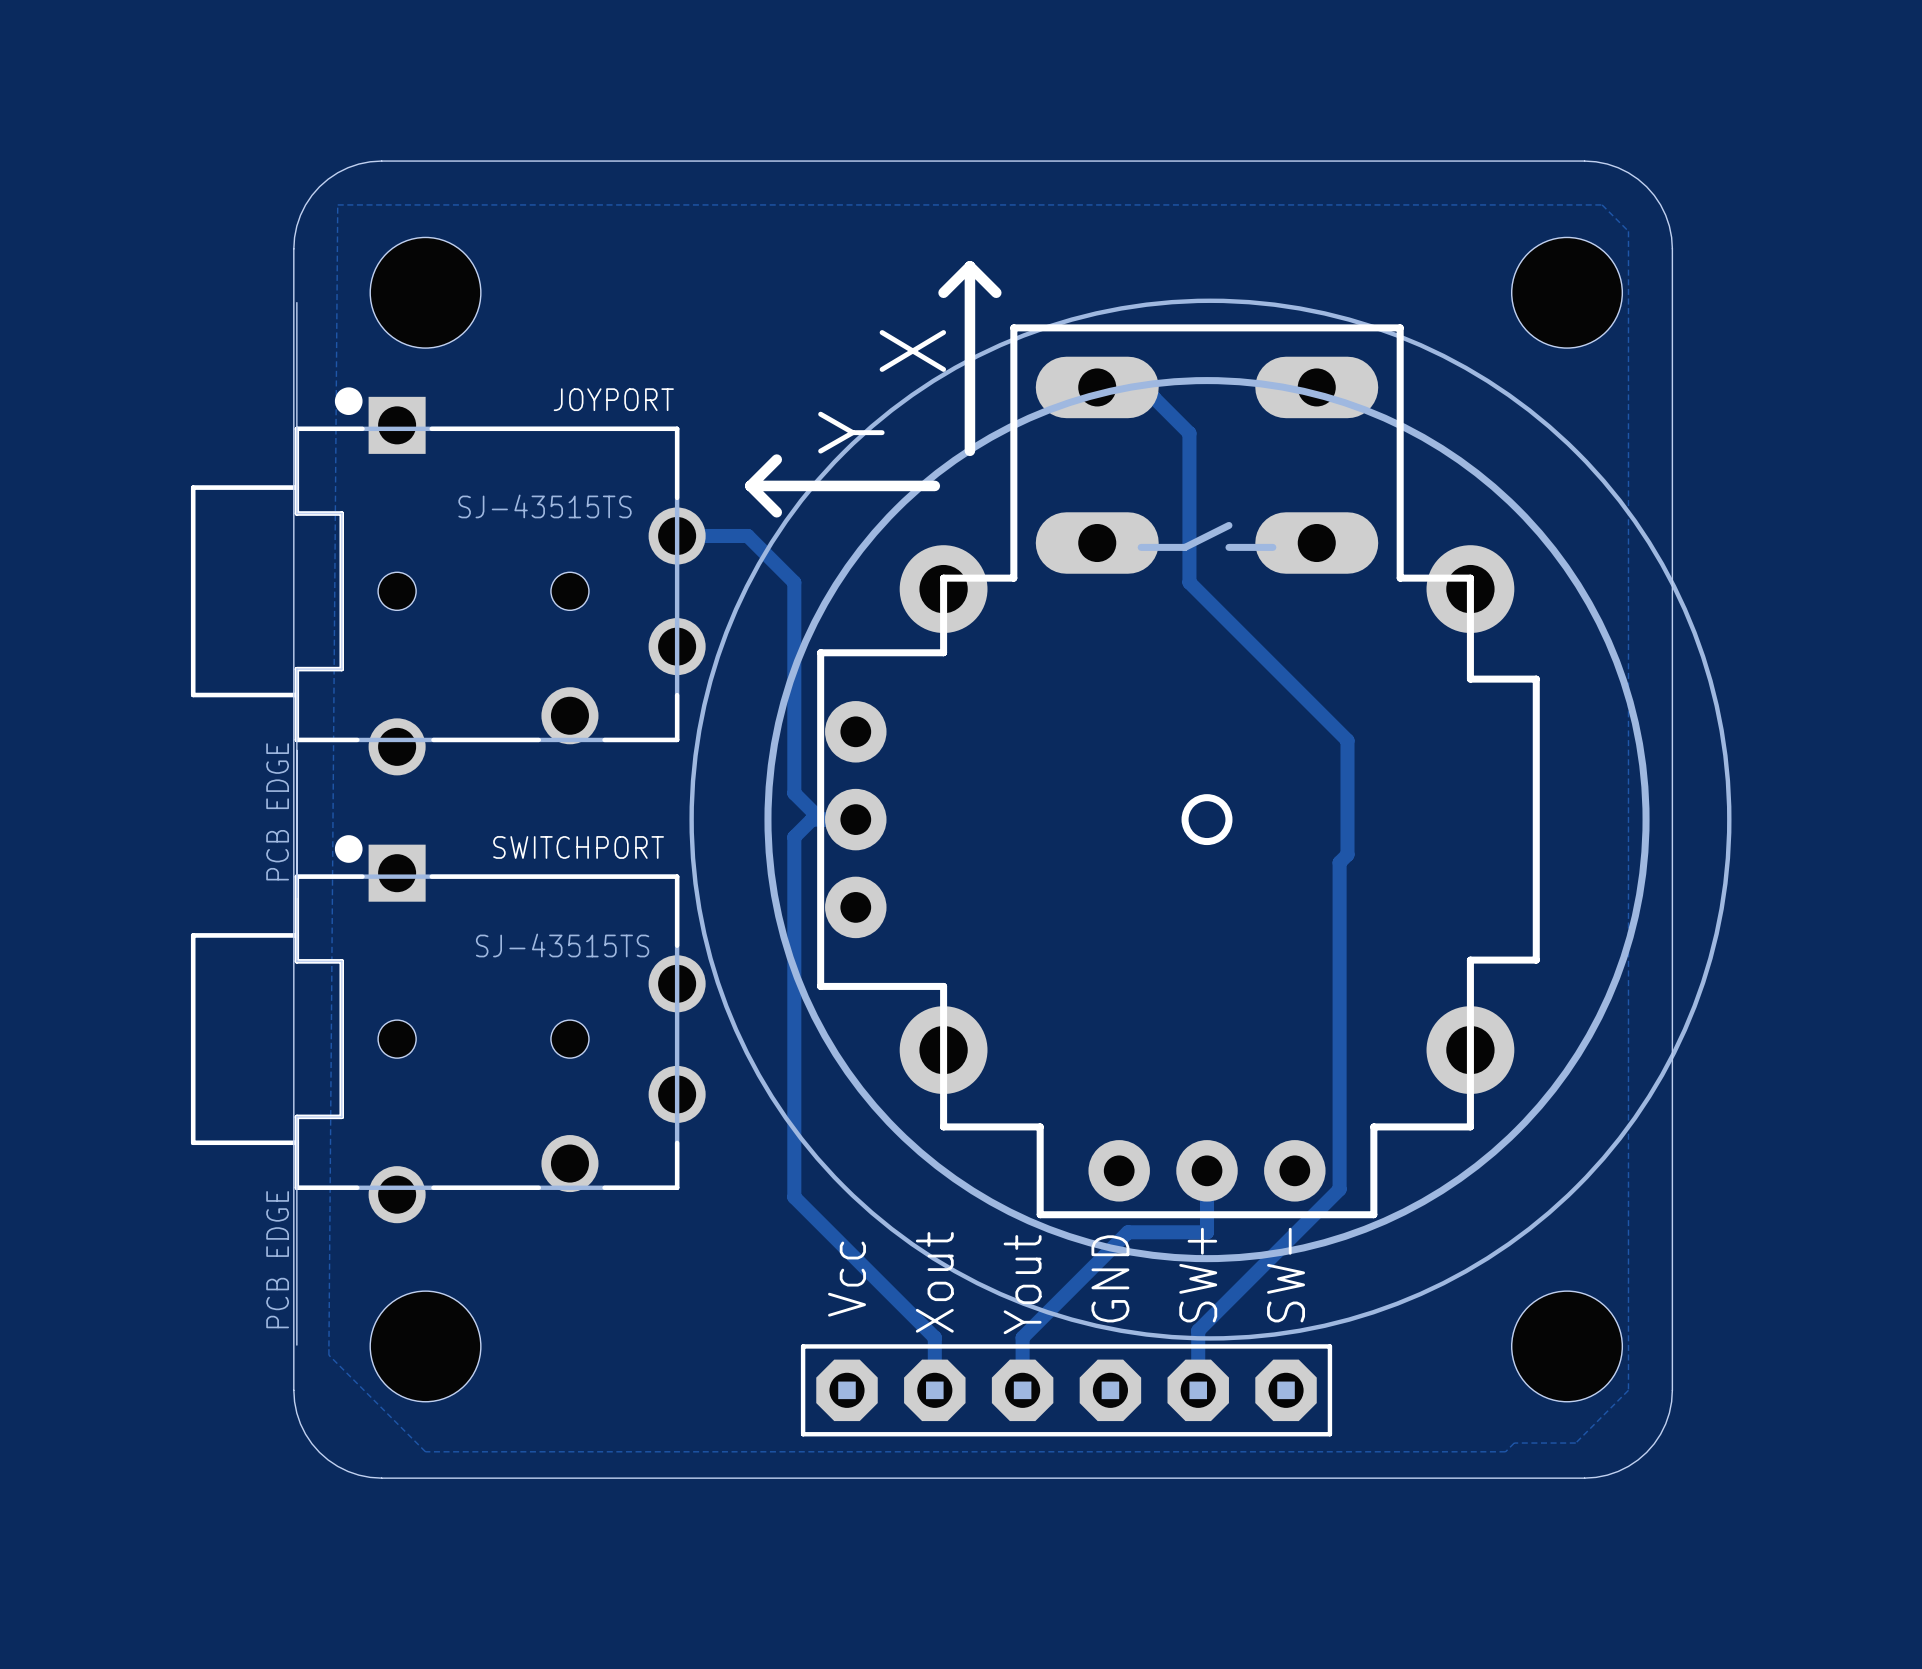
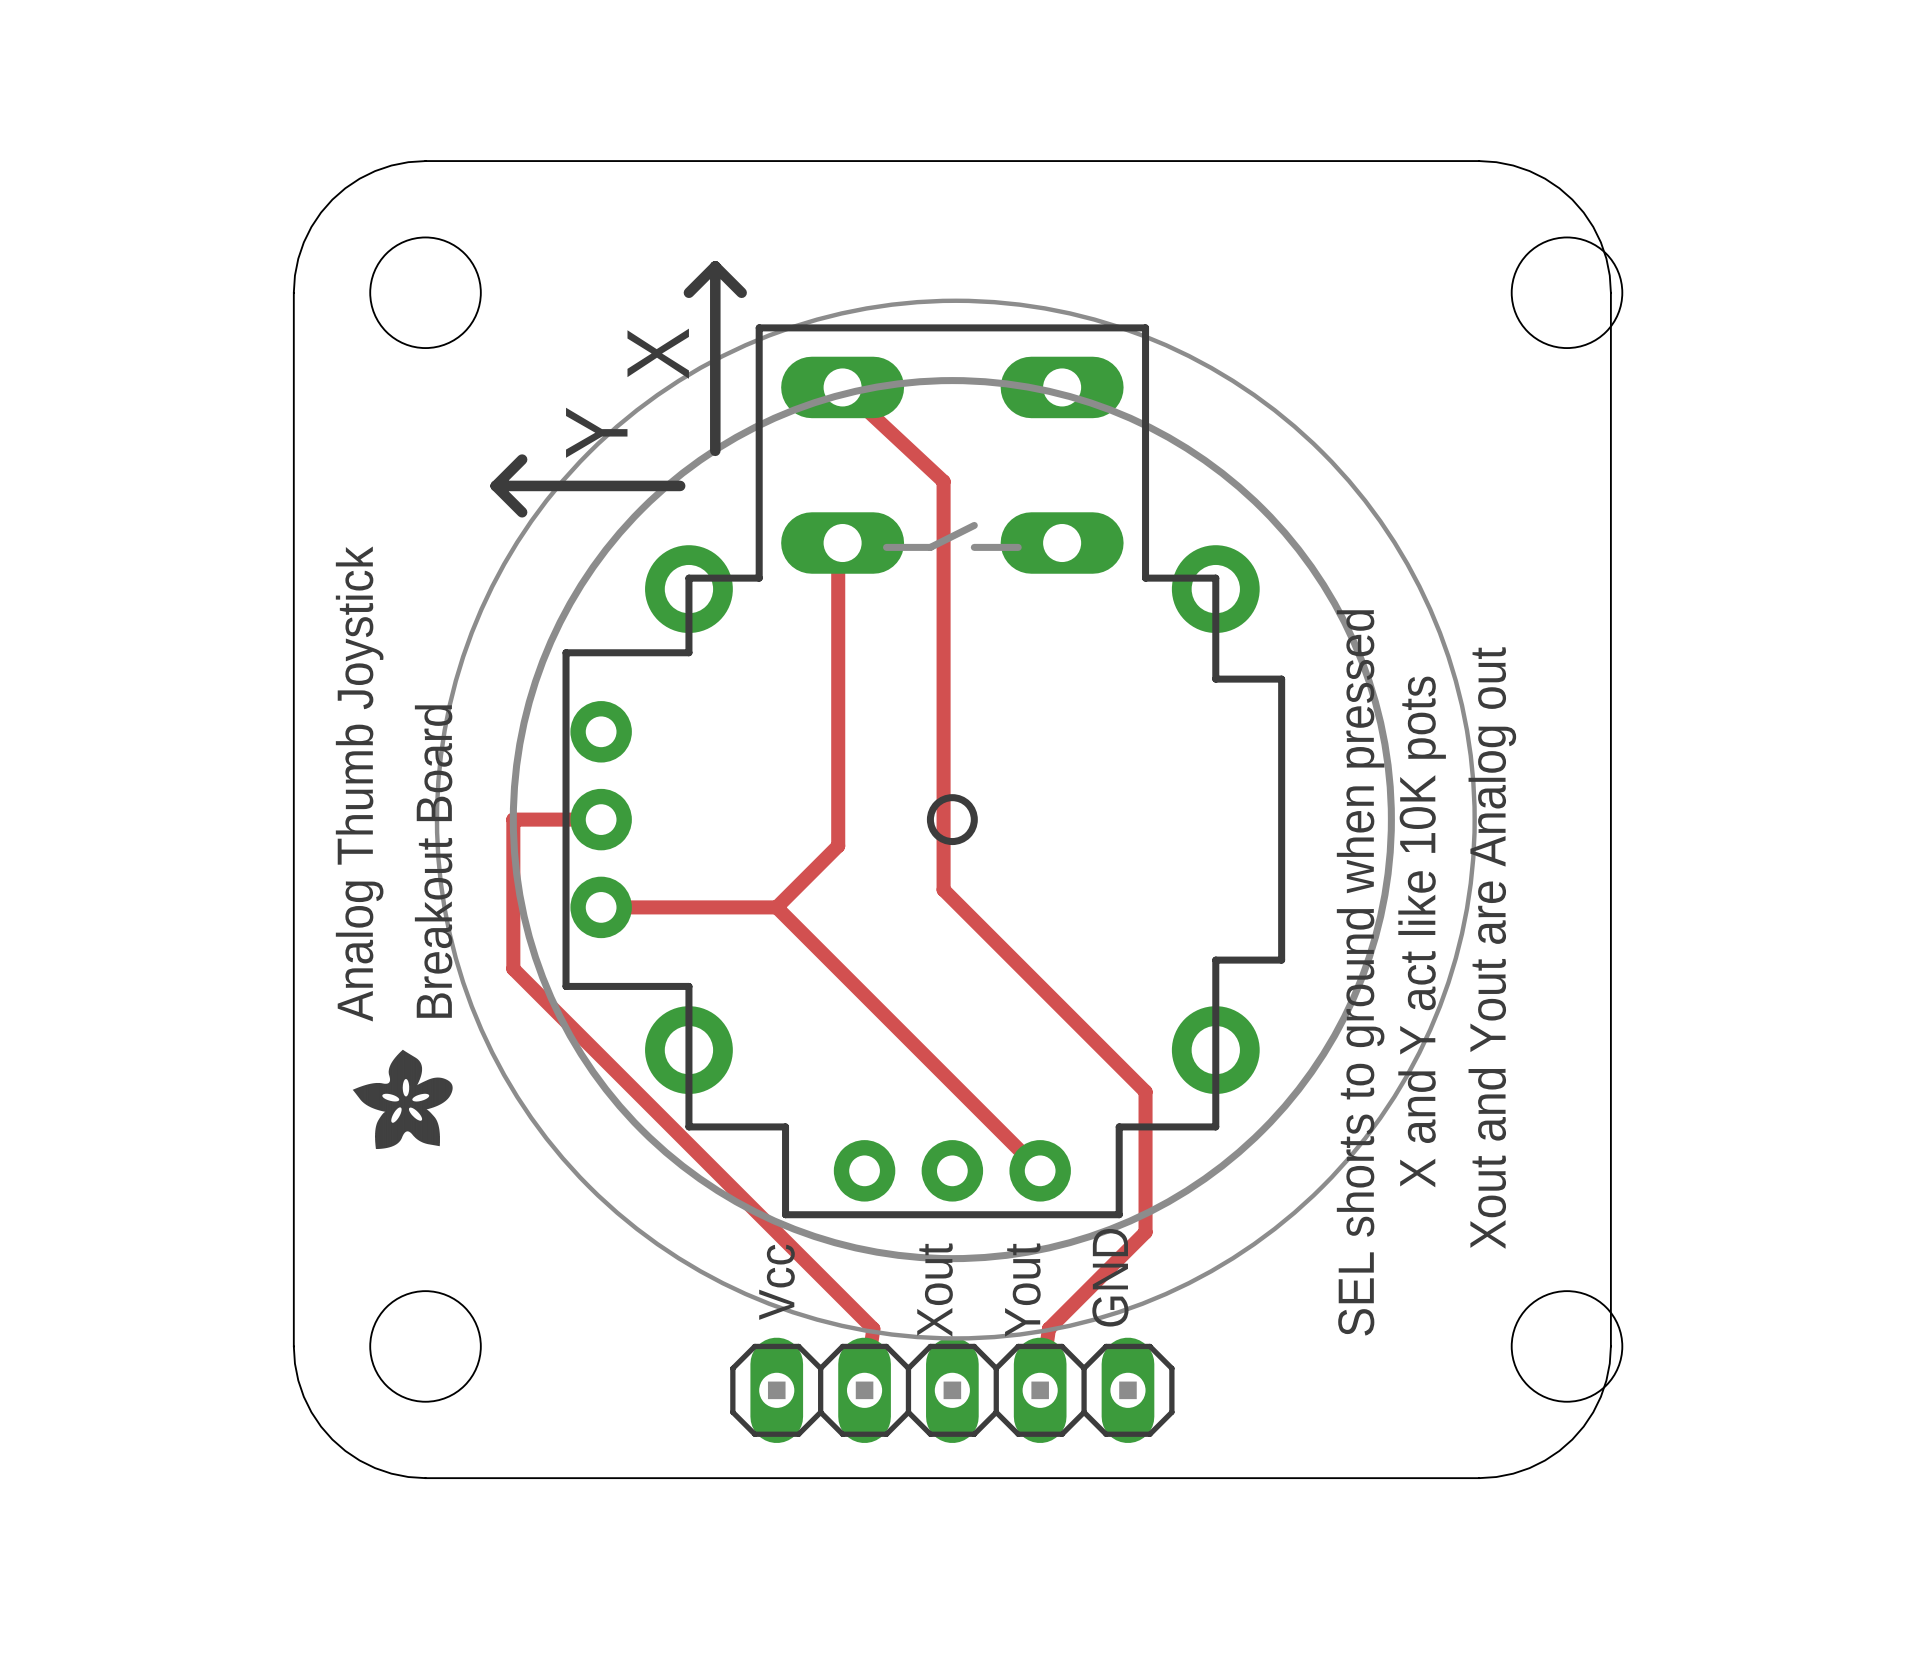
board edge: (425, 161) (381, 161) (358, 164) (337, 172) (319, 186) (305, 204) (296, 226) (293, 248) (293, 292) -> (425, 161) (391, 165) (375, 171) (359, 178) (332, 199) (311, 226) (303, 242) (298, 258) (293, 292)
board edge: (1479, 161) (1584, 161) (1618, 167) (1638, 179) (1654, 195) (1669, 226) (1672, 248) (1671, 1401) (1665, 1423) (1654, 1443) (1638, 1460) (1618, 1471) (1584, 1478) (1479, 1478) -> (1479, 161) (1513, 165) (1529, 171) (1545, 178) (1572, 199) (1593, 226) (1600, 242) (1606, 258) (1610, 292) (1609, 1363) (1606, 1380) (1593, 1412) (1572, 1439) (1545, 1460) (1529, 1468) (1513, 1473) (1479, 1478)
zone outline: (337, 204) (328, 1355) (425, 1451) (1505, 1451) (1514, 1443) (1575, 1443) (1628, 1390) (1628, 231) (1602, 204) (337, 204) -> none
line: (969, 266) (943, 292) -> (715, 266) (688, 292)
line: (969, 266) (969, 450) -> (715, 266) (715, 450)
line: (969, 266) (996, 292) -> (715, 266) (741, 292)
text position: X (912, 350) -> X (658, 353)
track: none -> (842, 387) (943, 481) (943, 889) (1145, 1091) (1145, 1232) (1048, 1328) (1040, 1390)
track: (1097, 387) (1077, 387) (1066, 398) (1154, 398) (1189, 433) (1189, 582) (1347, 740) (1347, 854) (1339, 862) (1339, 1189) (1198, 1330) (1198, 1390) -> none
text position: Y (851, 432) -> Y (596, 432)
line: (776, 459) (750, 485) -> (522, 459) (495, 485)
line: (750, 485) (776, 512) -> (495, 485) (522, 512)
line: (750, 485) (934, 485) -> (495, 485) (680, 485)
track: (677, 535) (747, 535) (794, 582) (794, 793) (820, 819) -> none
track: none -> (842, 543) (838, 556) (838, 845) (776, 907)
JOYPORT: SJ-43515TS (448, 599) -> none
text: none -> Analog Thumb Joystick (359, 783)
track: none -> (601, 819) (513, 819) (513, 968) (873, 1328) (864, 1390)
track: (855, 819) (811, 819) (794, 837) (794, 1197) (934, 1337) (934, 1390) -> none
part position: (1210, 819) -> (955, 819)
text: none -> Breakout Board (433, 861)
text: none -> X and Y act like 10K pots (1422, 932)
text: none -> Xout and Yout are Analog out (1492, 948)
text: none -> SEL shorts to ground when pressed (1360, 972)
track: none -> (601, 907) (776, 907)
track: none -> (776, 907) (1040, 1170)
SWITCHPORT: SJ-43515TS (448, 1047) -> none
drawing: none -> [352, 1049, 453, 1150]
track: (1207, 1170) (1207, 1232) (1127, 1232) (1022, 1337) (1022, 1390) -> none
text: SW+ (1198, 1275) -> none
text: SW- (1286, 1275) -> none
text position: Vcc (847, 1279) -> Vcc (777, 1282)
board edge: (293, 1346) (293, 1390) (296, 1413) (305, 1434) (319, 1452) (337, 1466) (358, 1475) (381, 1478) (425, 1478) -> (293, 1346) (298, 1380) (303, 1396) (311, 1412) (332, 1439) (359, 1460) (375, 1468) (391, 1473) (425, 1478)
part: none -> (952, 1390)
part: (1066, 1390) -> none

